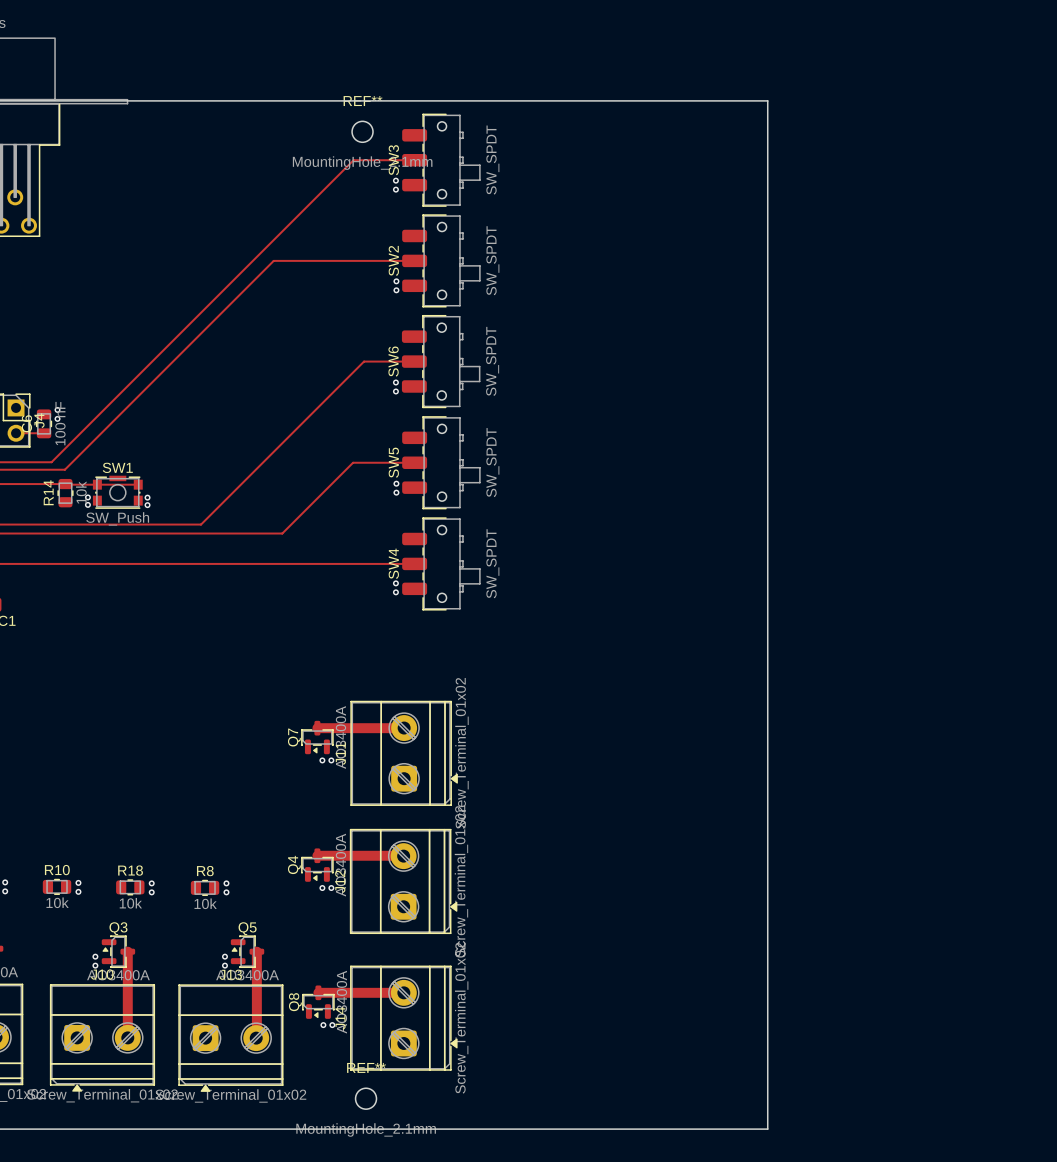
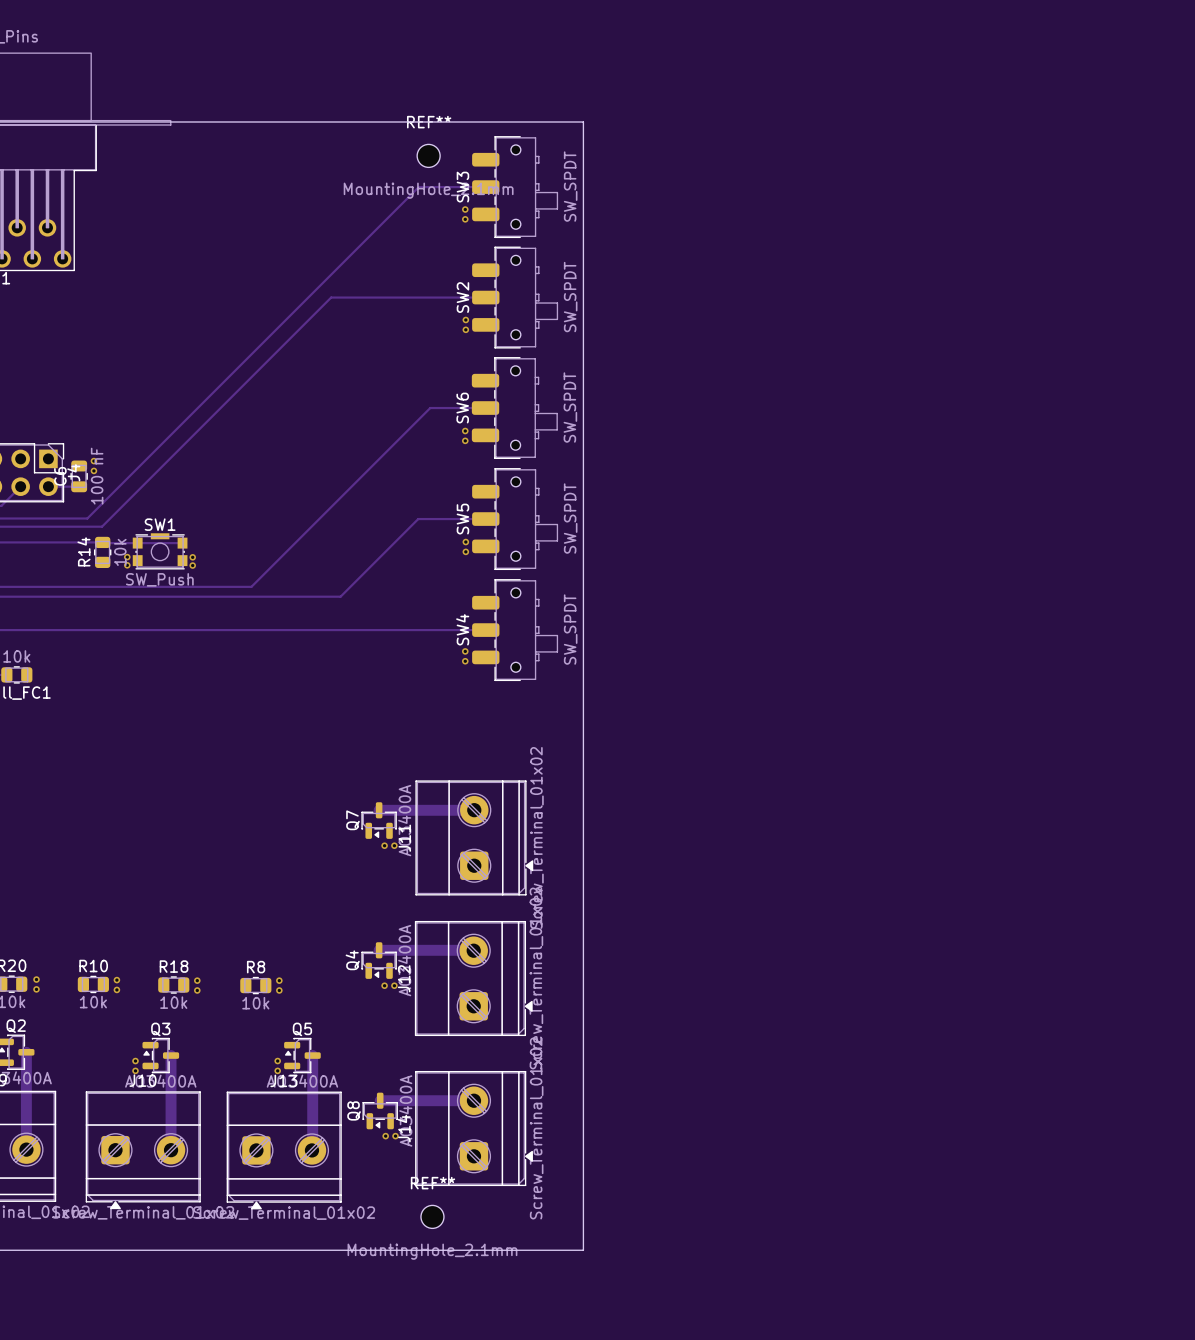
board edge: (503, 100) (767, 100) (767, 1129) (503, 1129) -> (583, 121) (583, 1250)

